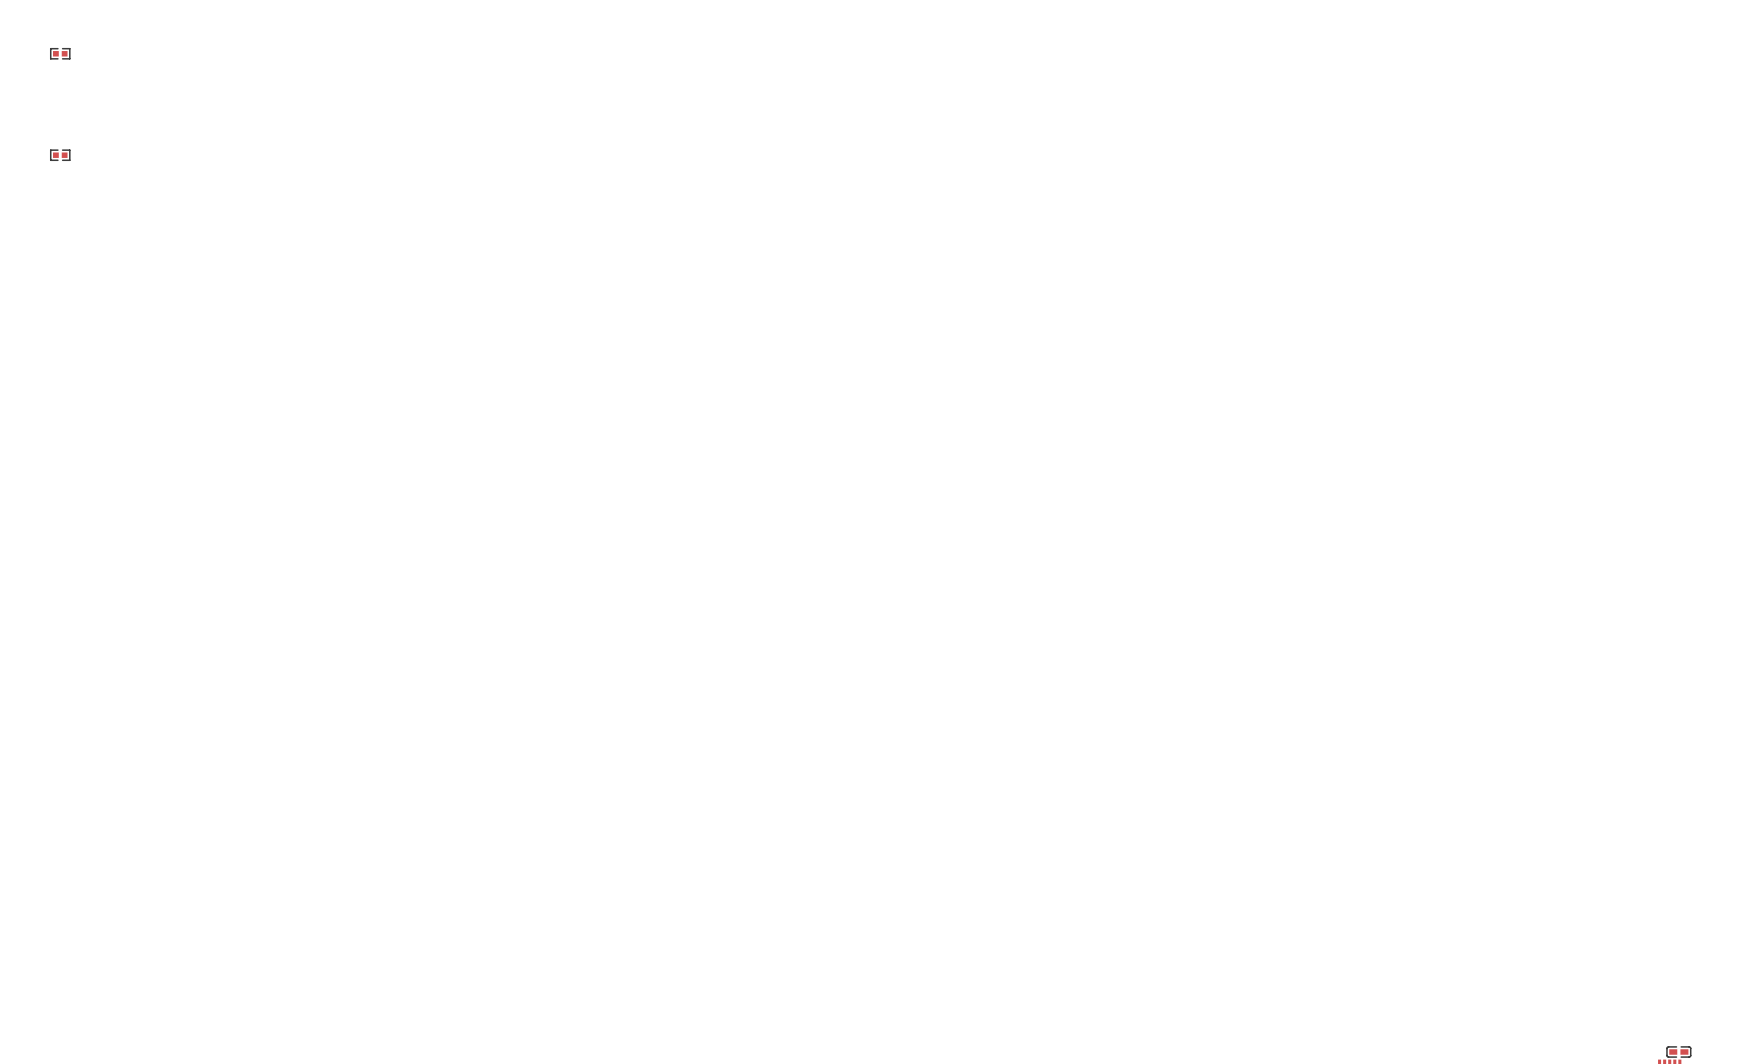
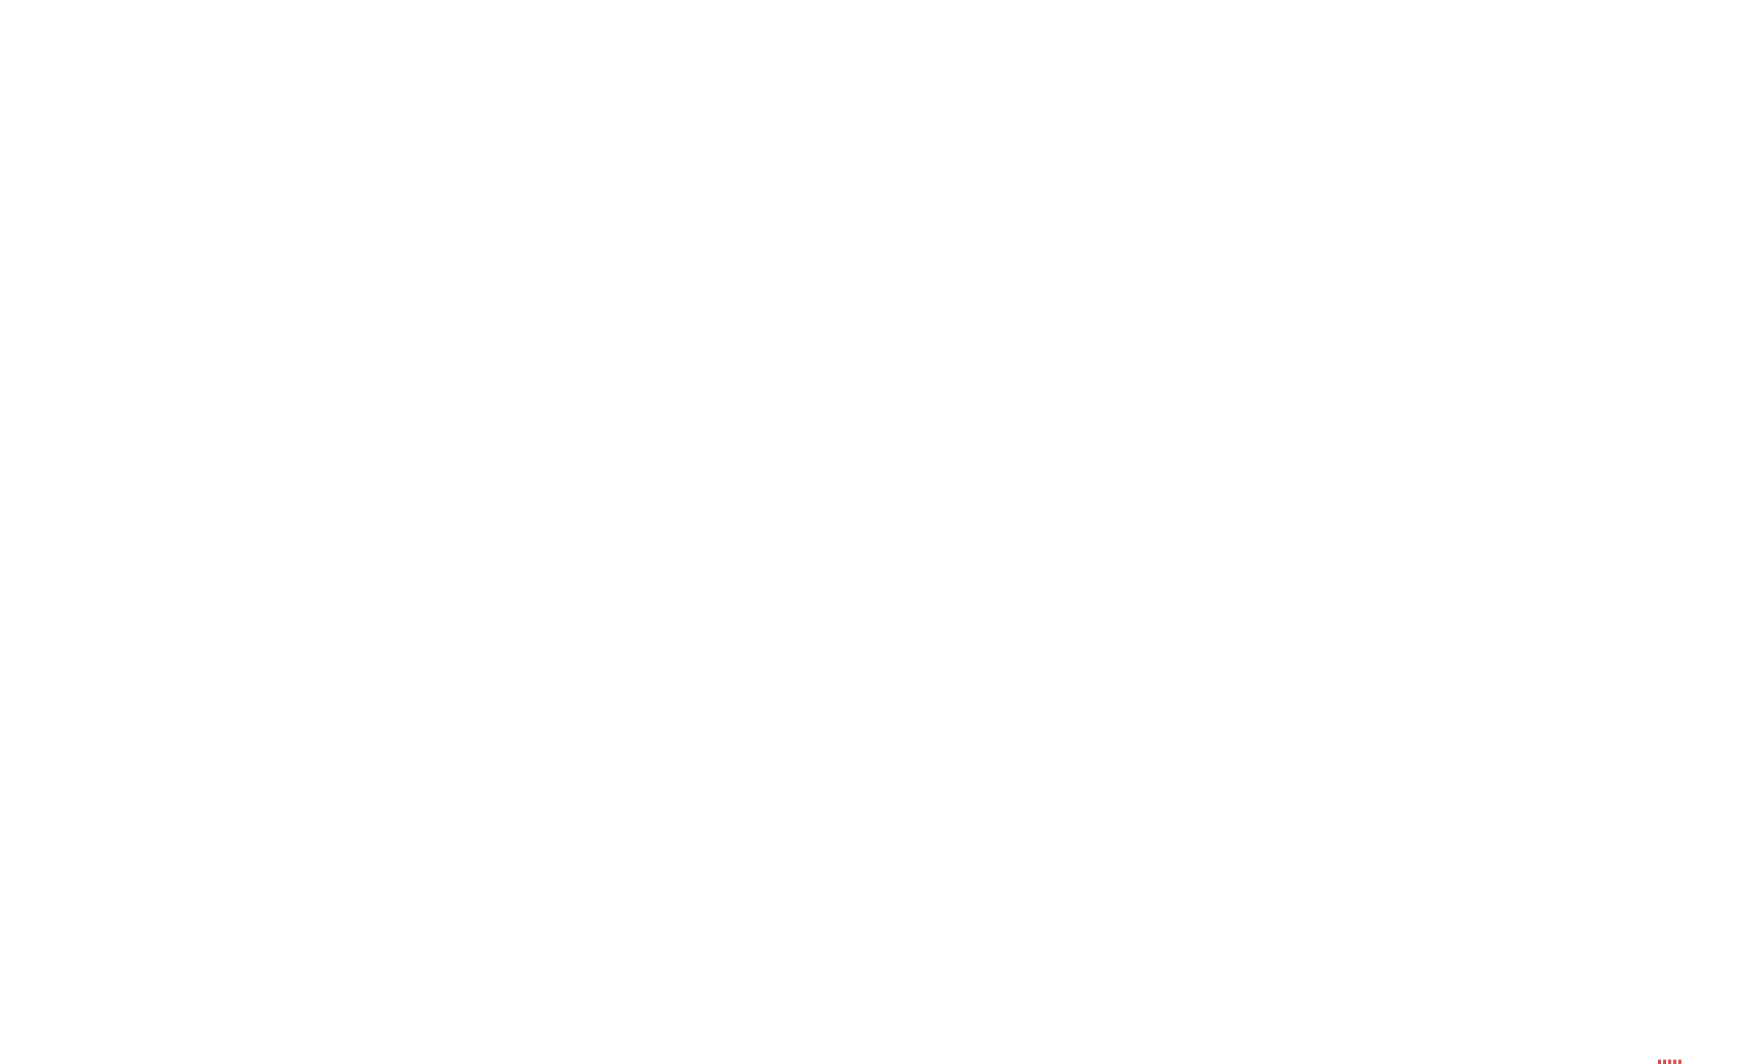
part: (60, 53) -> none
part: (60, 155) -> none
part: (1678, 1051) -> none

